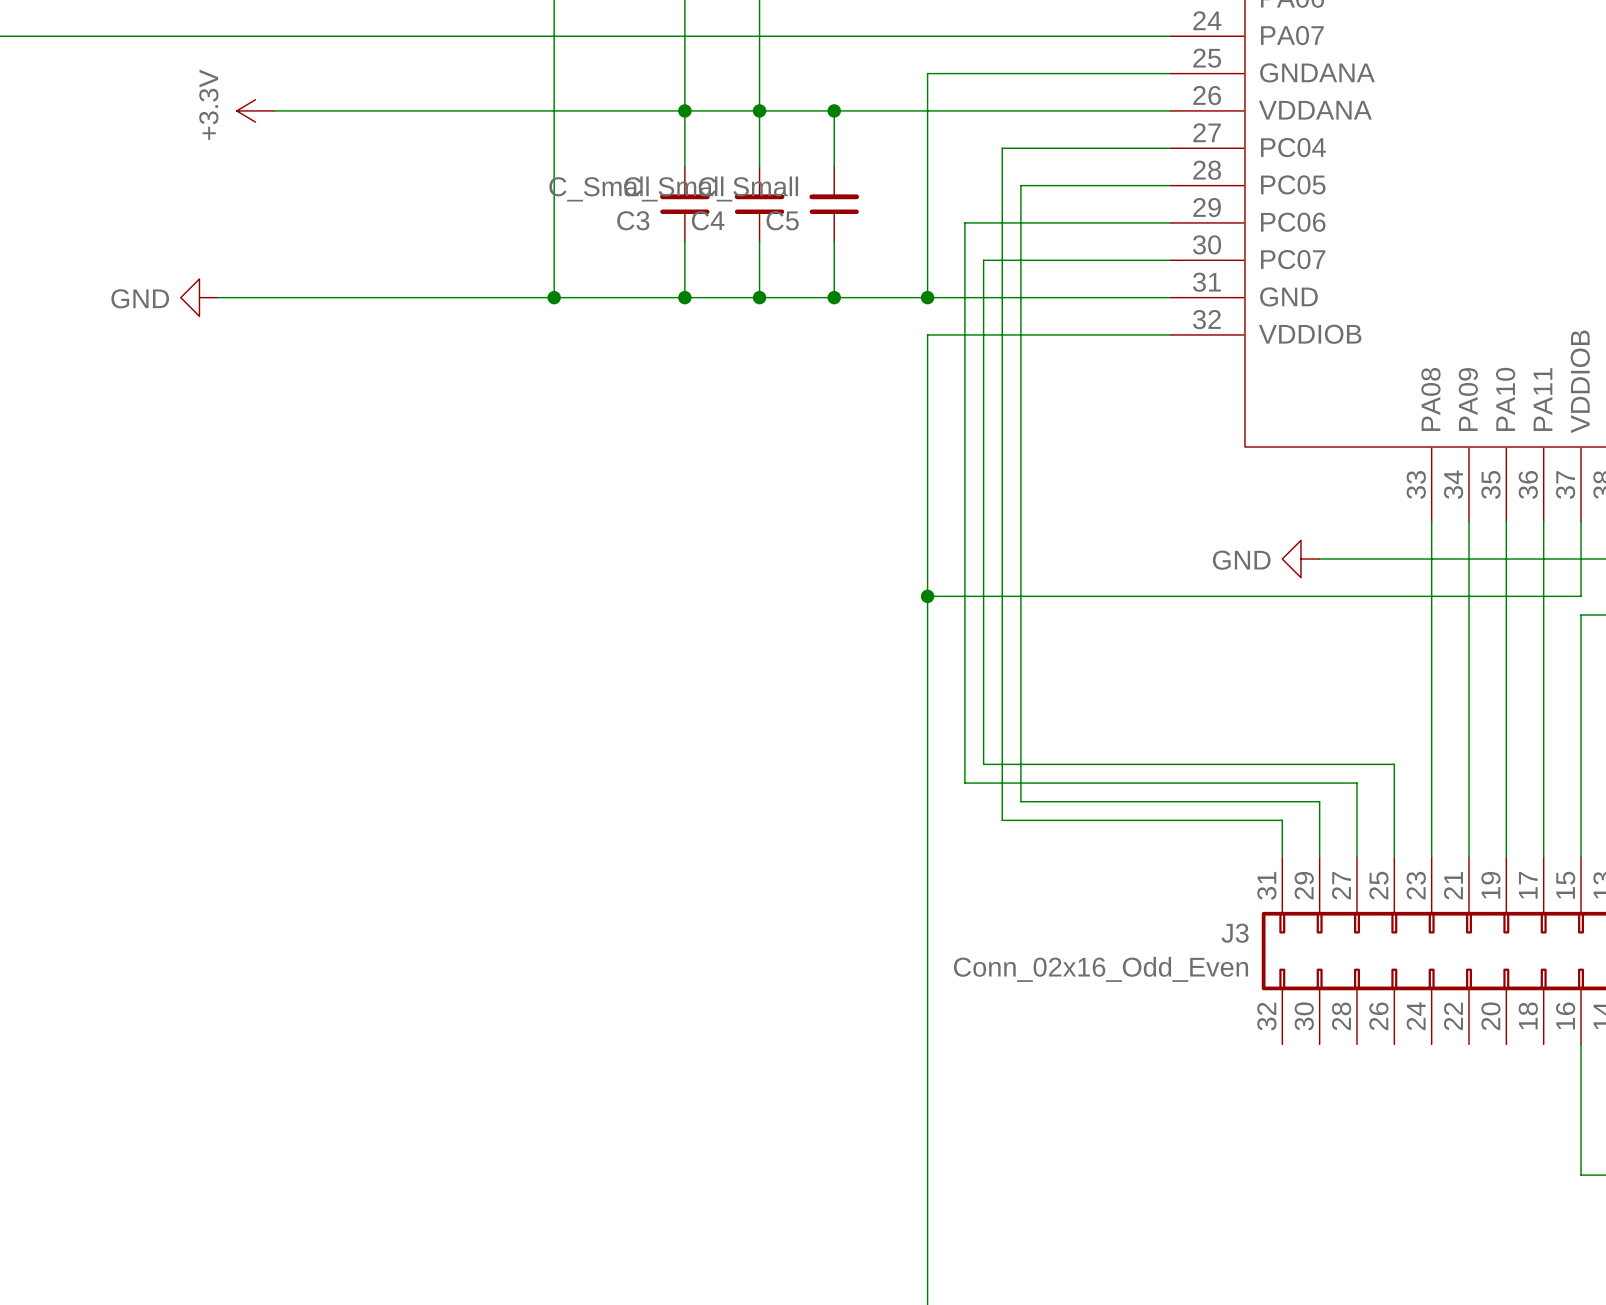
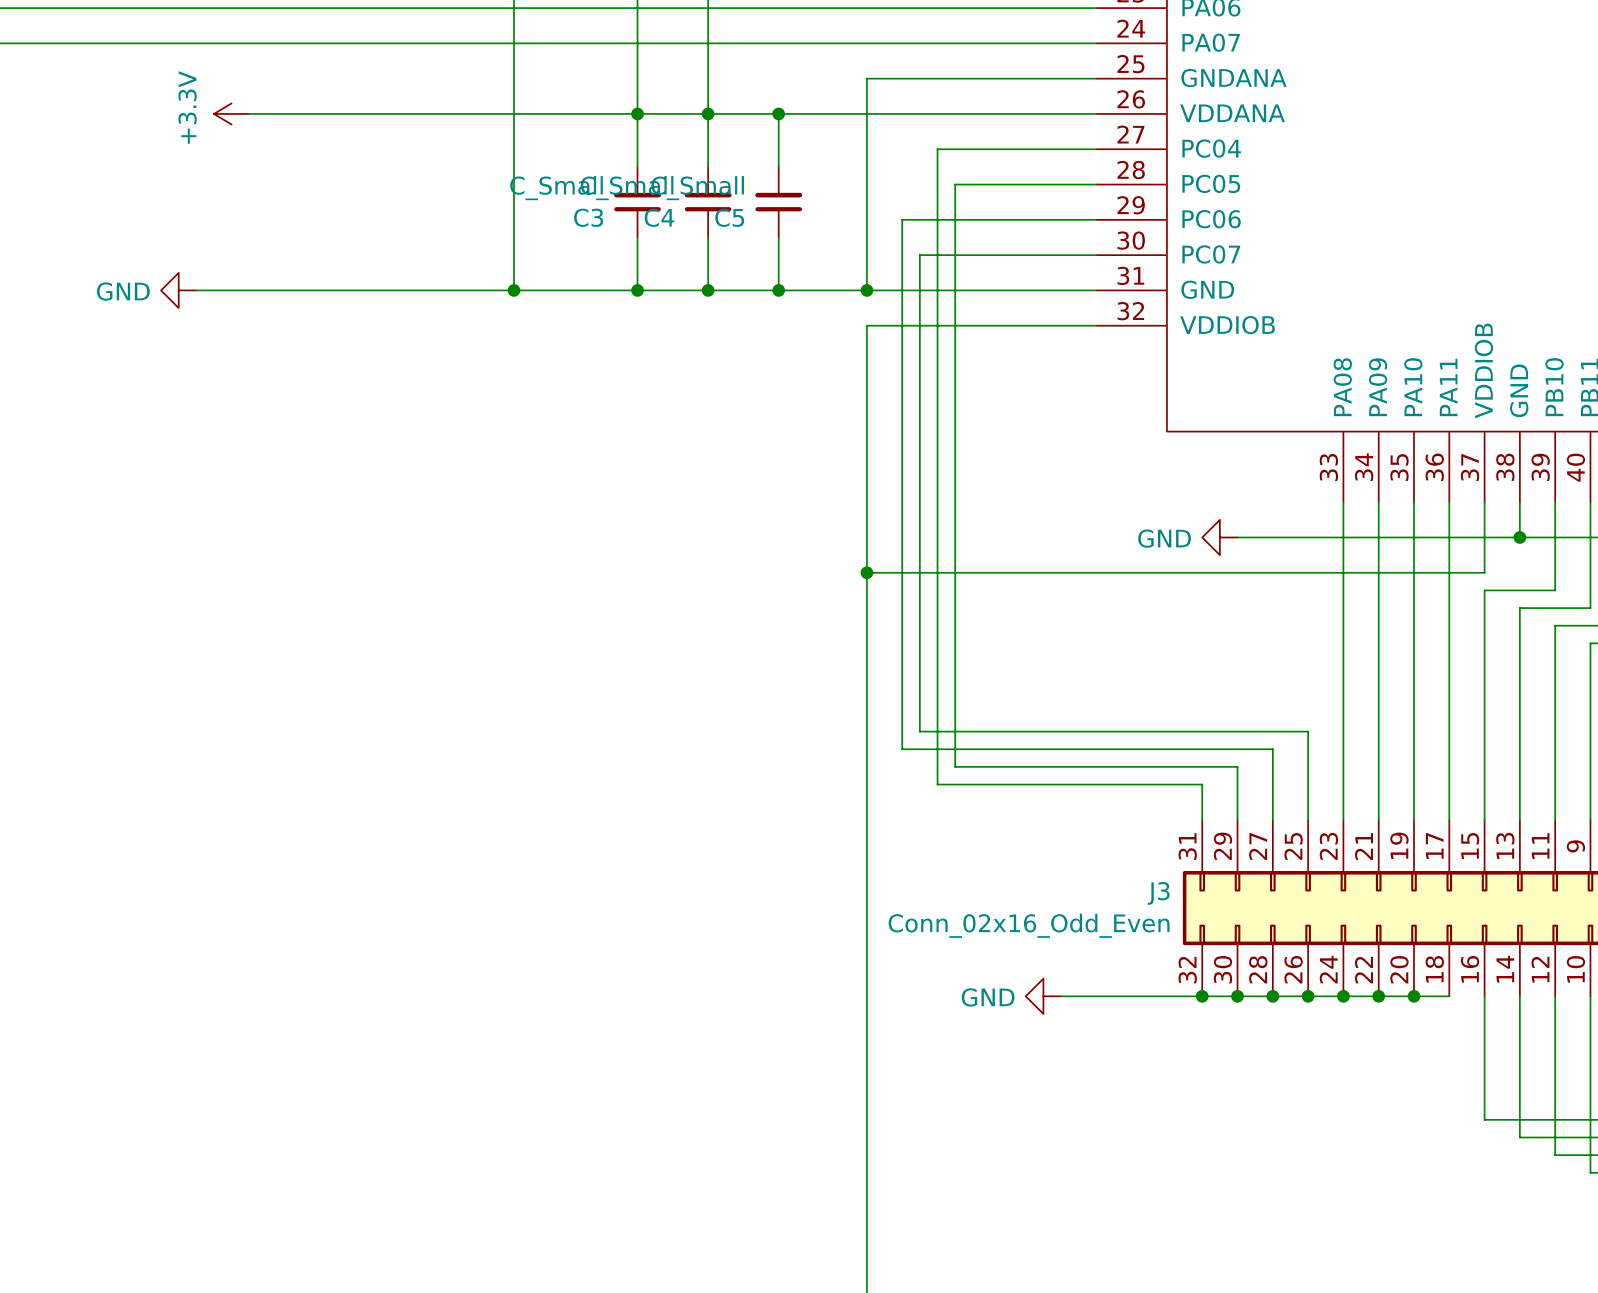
power symbol: none -> GND (1043, 996)
wire: none -> (1061, 996) (1449, 996)
junction: none -> (1202, 996)
junction: none -> (1237, 996)
junction: none -> (1272, 996)
junction: none -> (1308, 996)
junction: none -> (1343, 996)
junction: none -> (1378, 996)
junction: none -> (1414, 996)

